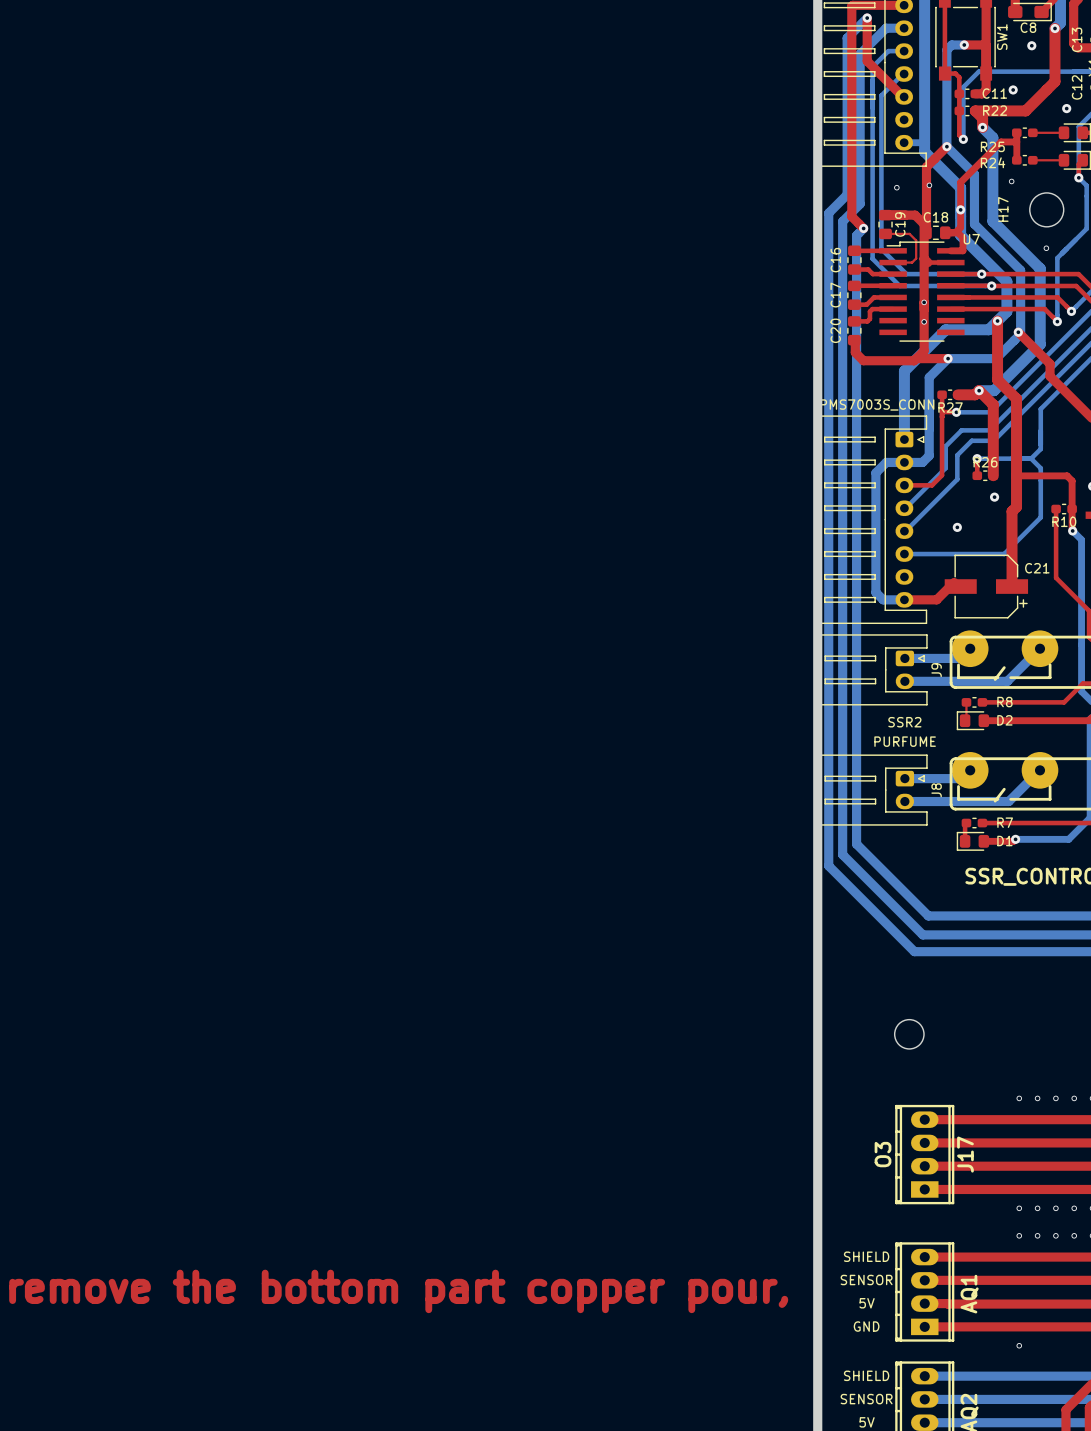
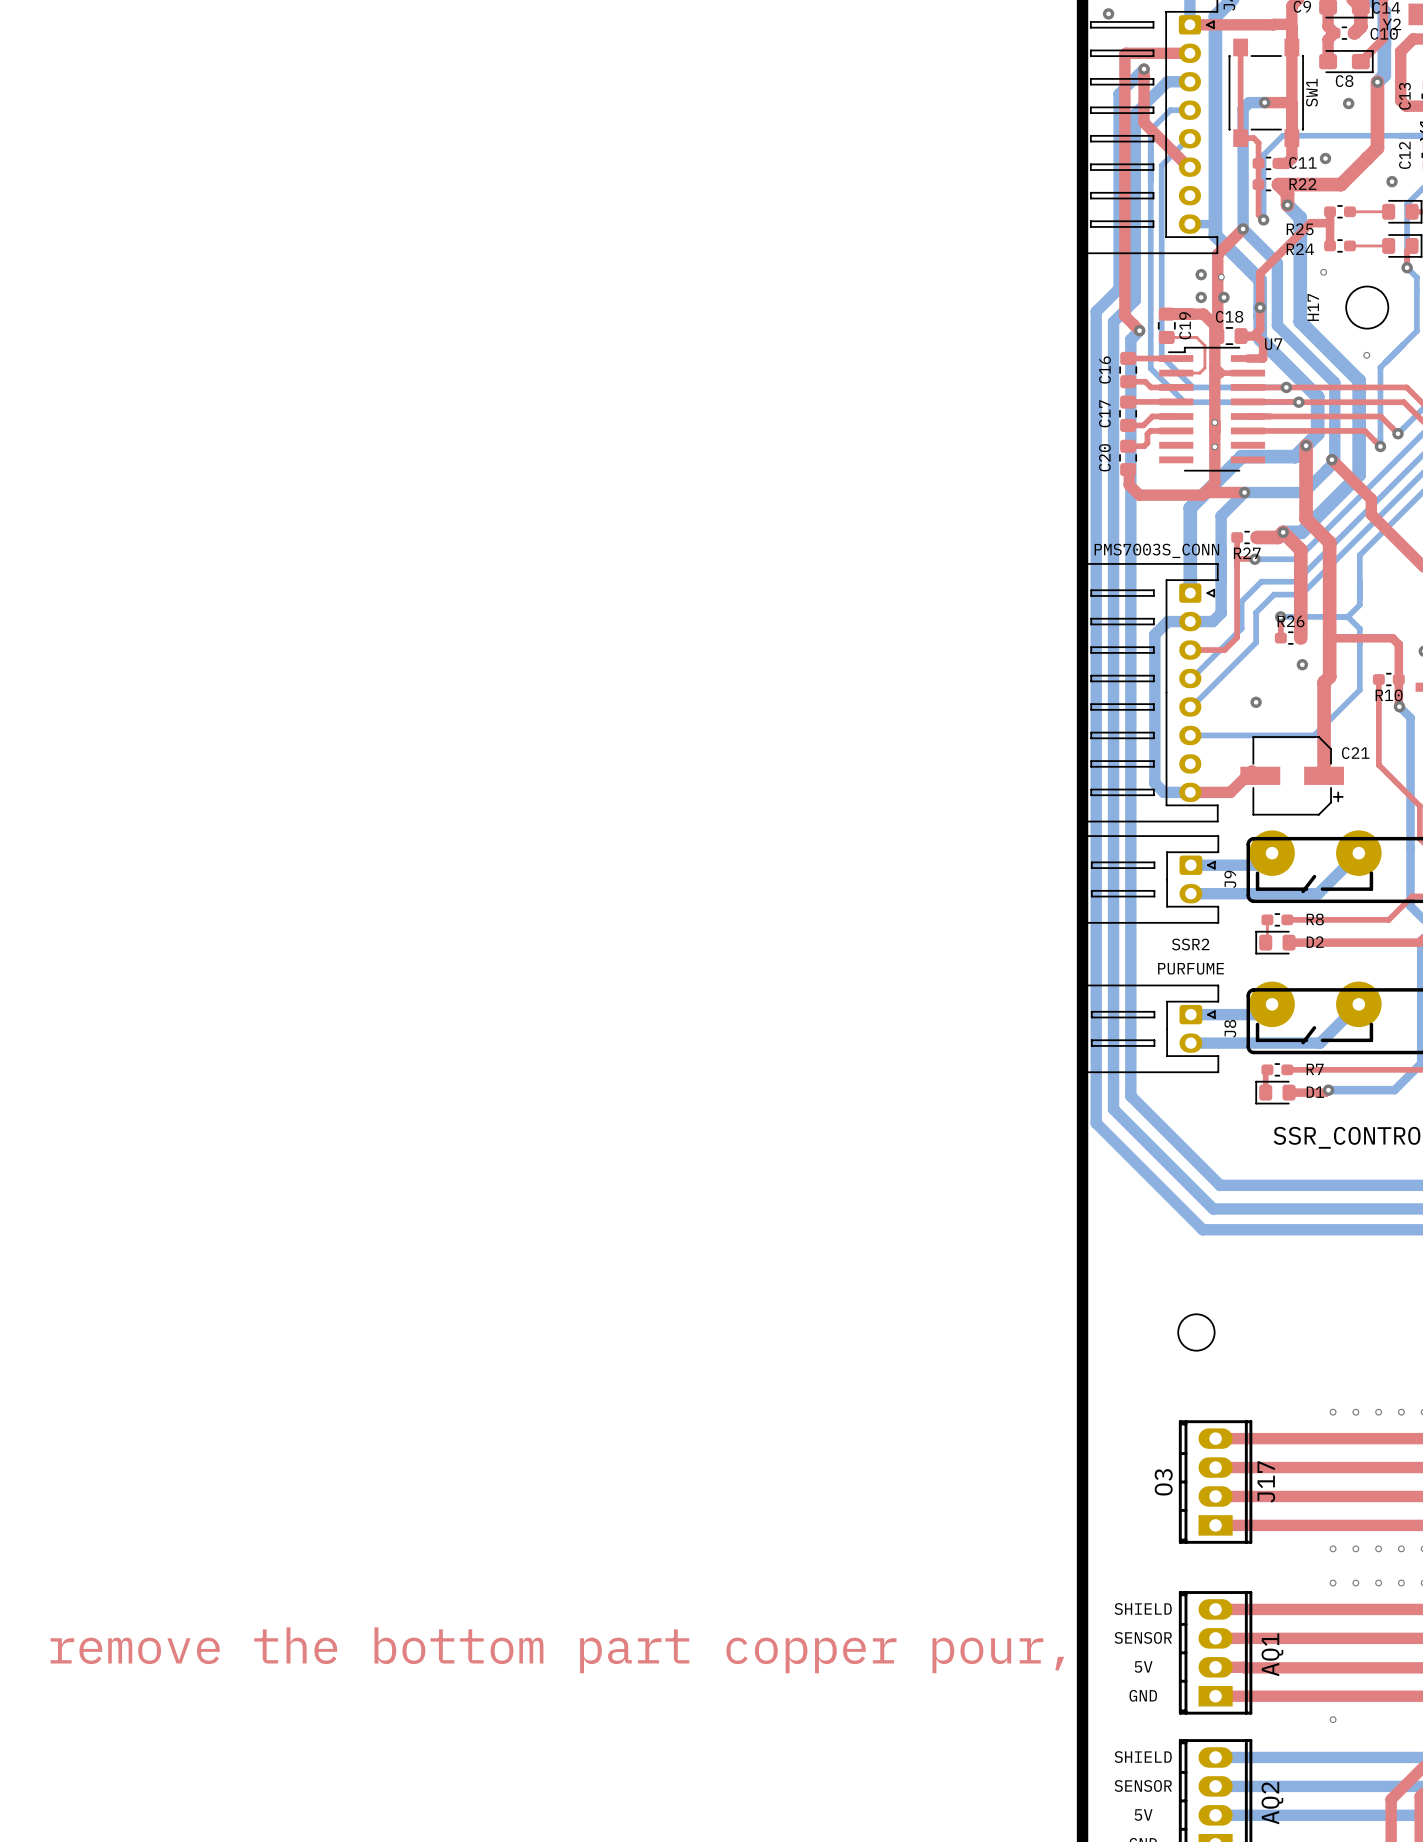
via: none -> (1201, 274)
via: (896, 187) -> none
via: none -> (1201, 297)
via: none -> (1223, 297)

